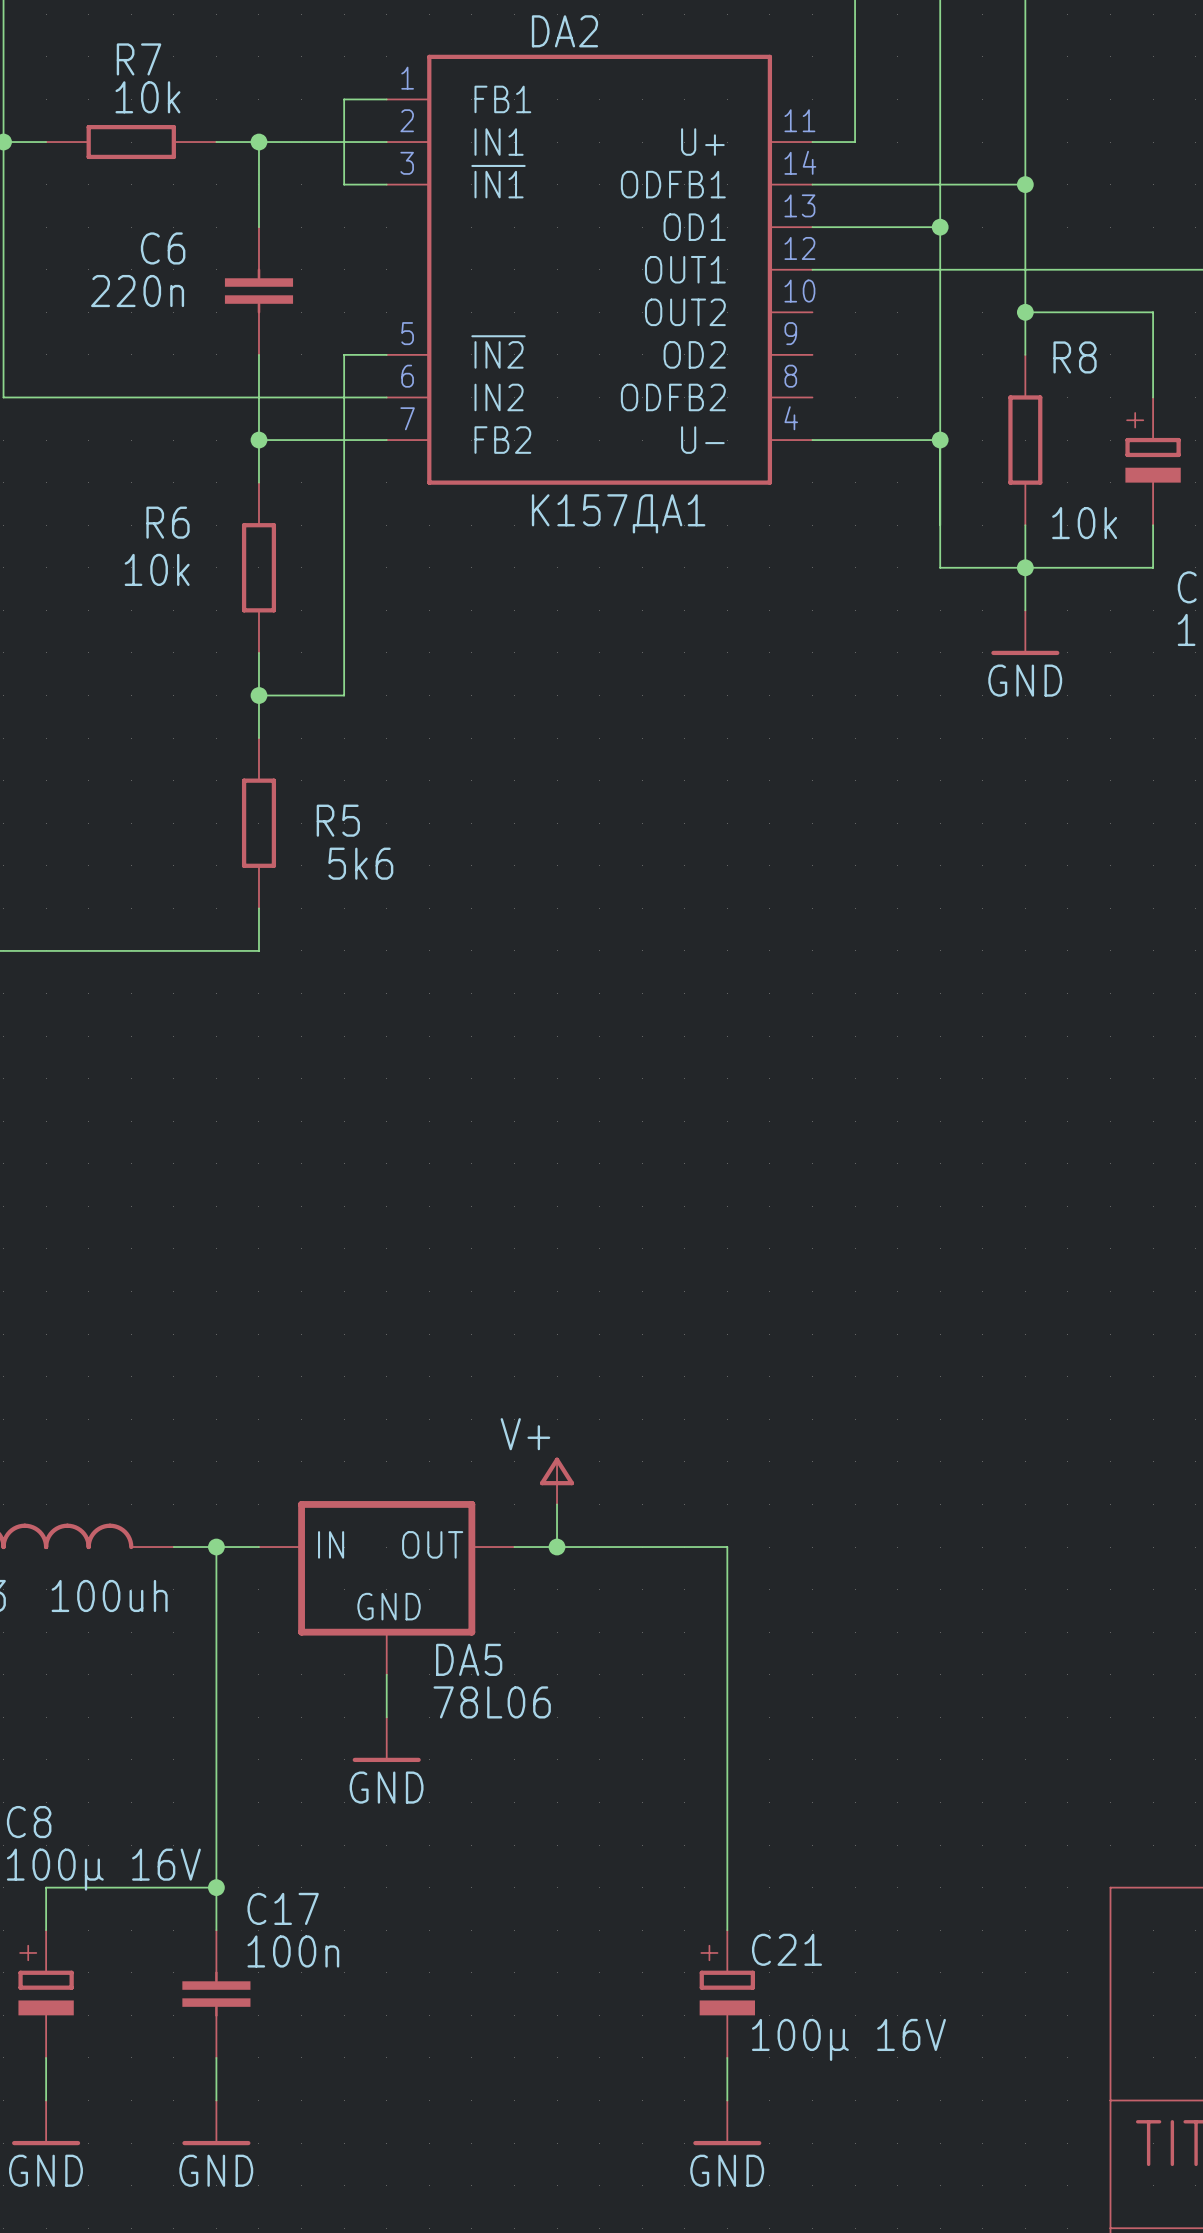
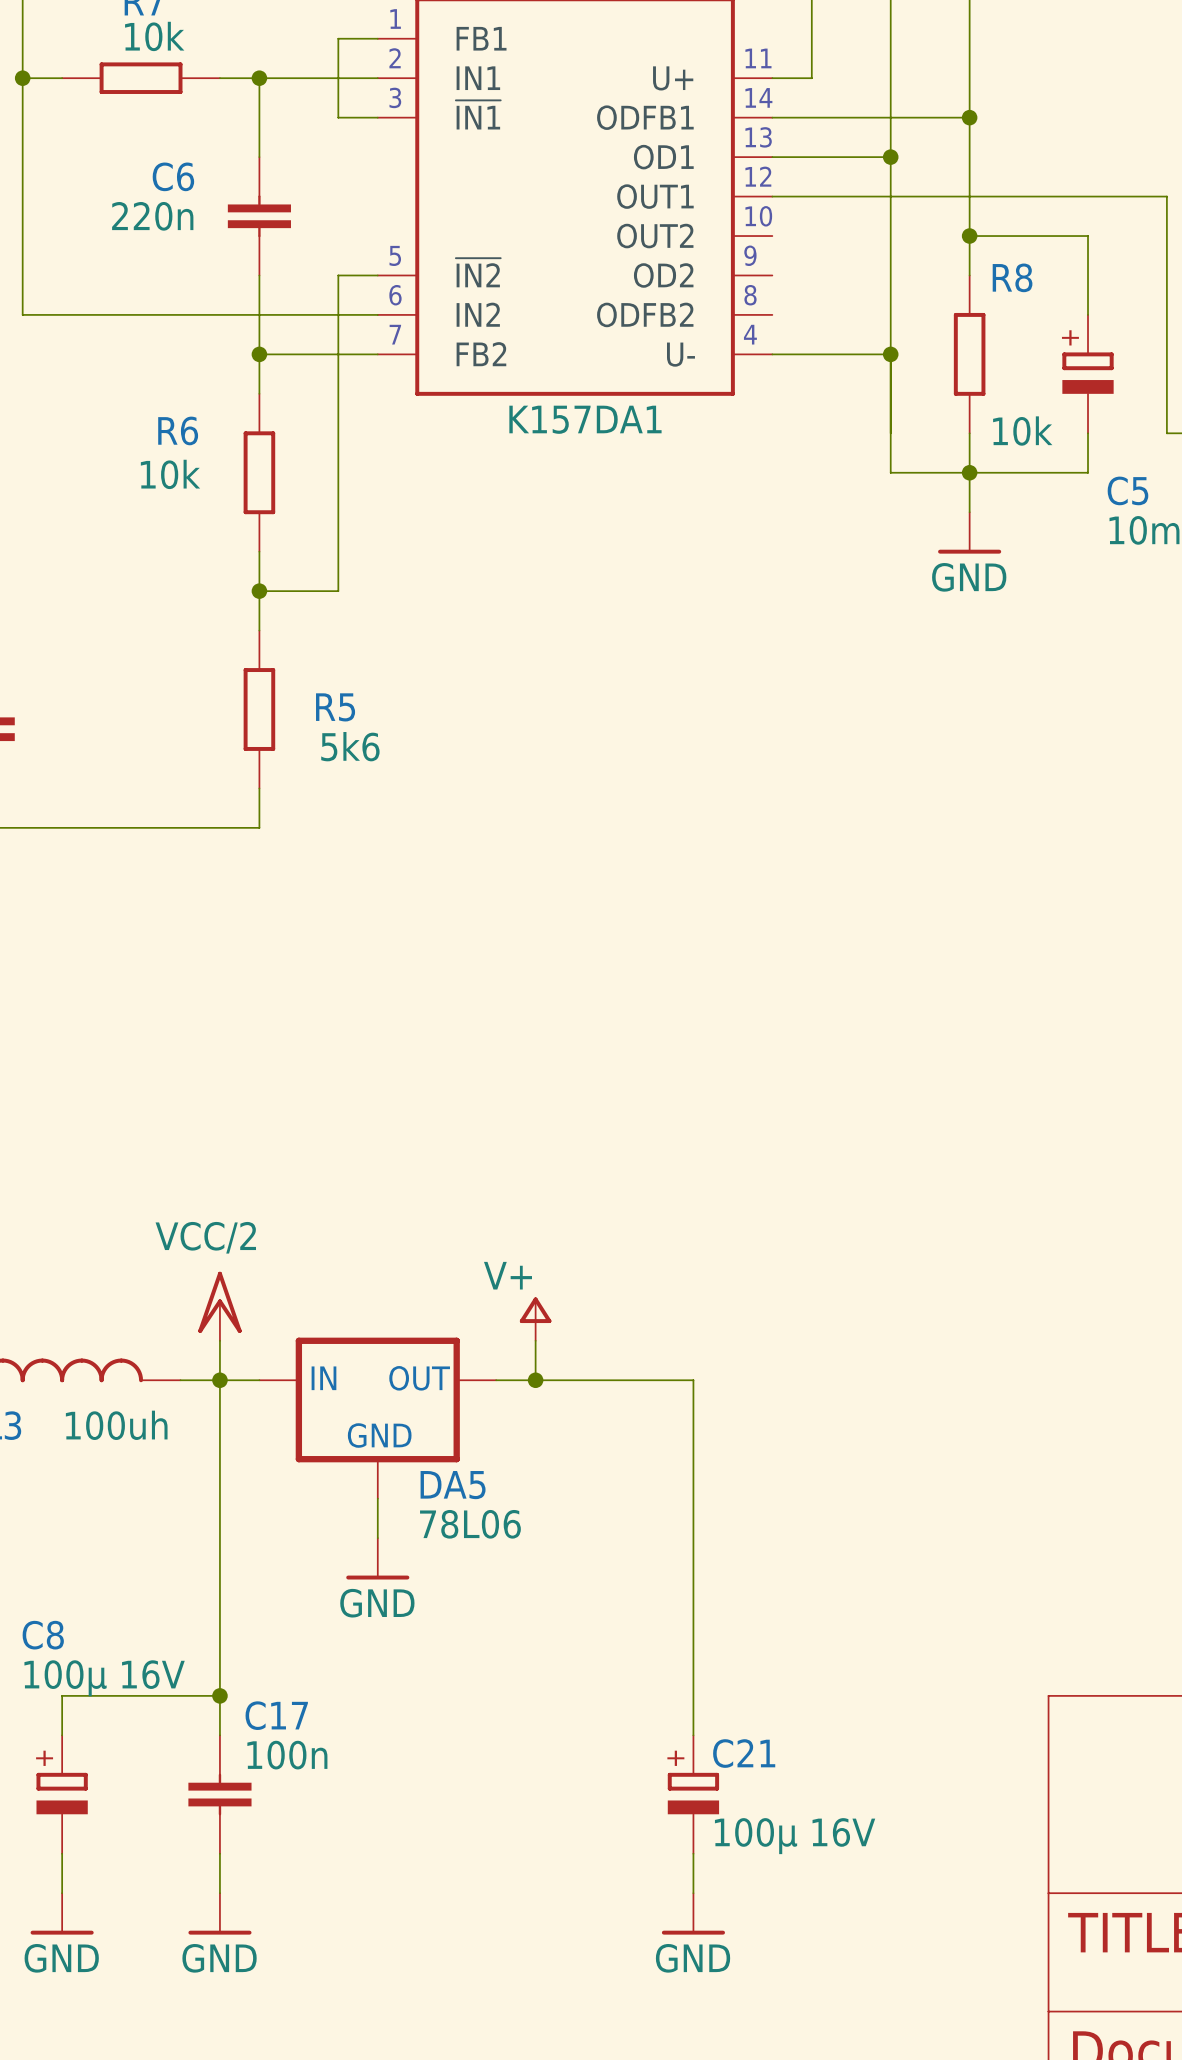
DA2 value: К157ДА1 (618, 513) -> K157DA1 (585, 419)
power symbol: none -> VCC/2 (219, 1306)
wire: none -> (219, 1340) (219, 1380)

